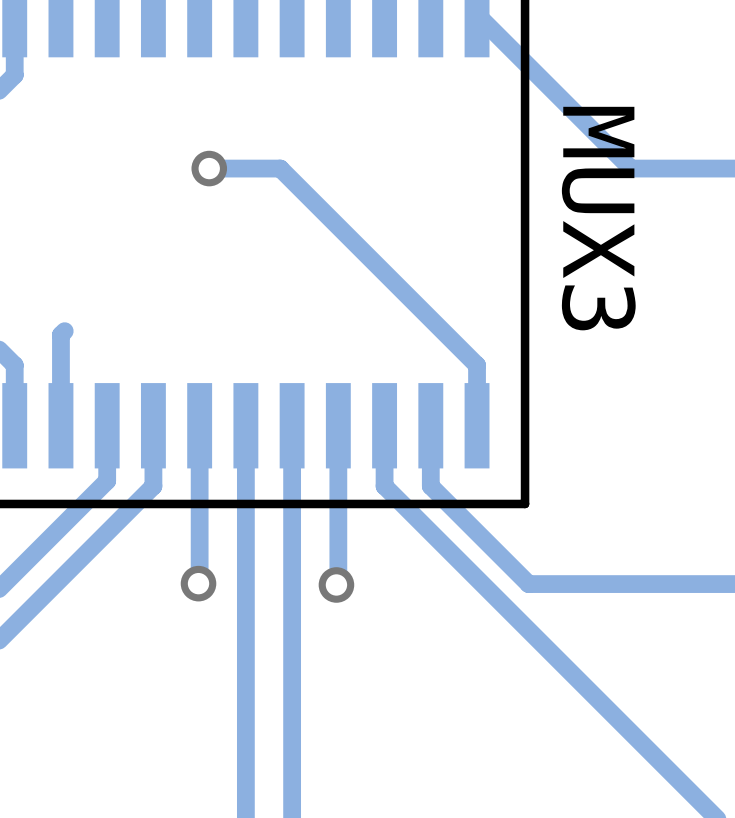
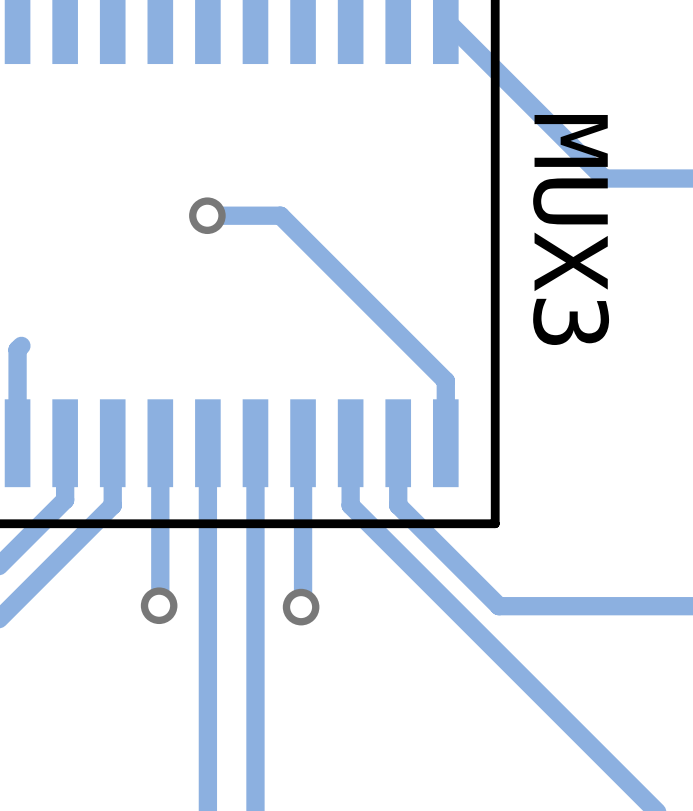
track: (209, 168) (280, 168) (316, 204) -> (207, 215) (280, 215)
via position: (209, 168) -> (207, 215)

